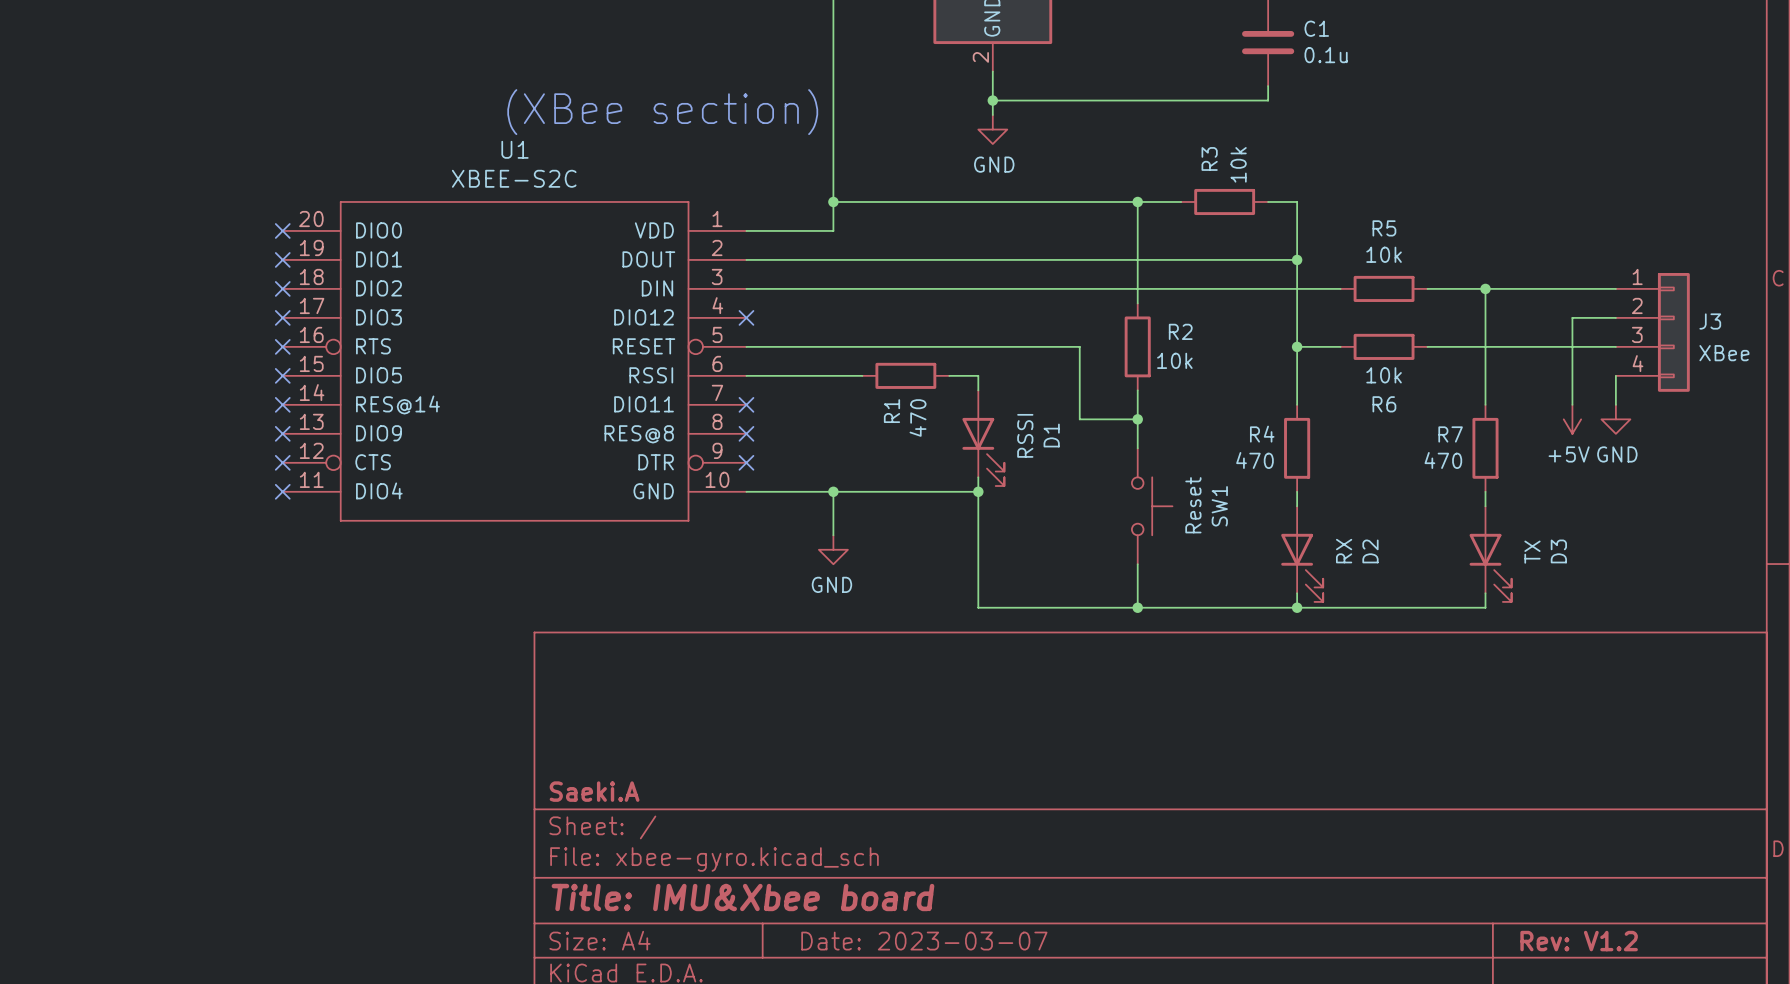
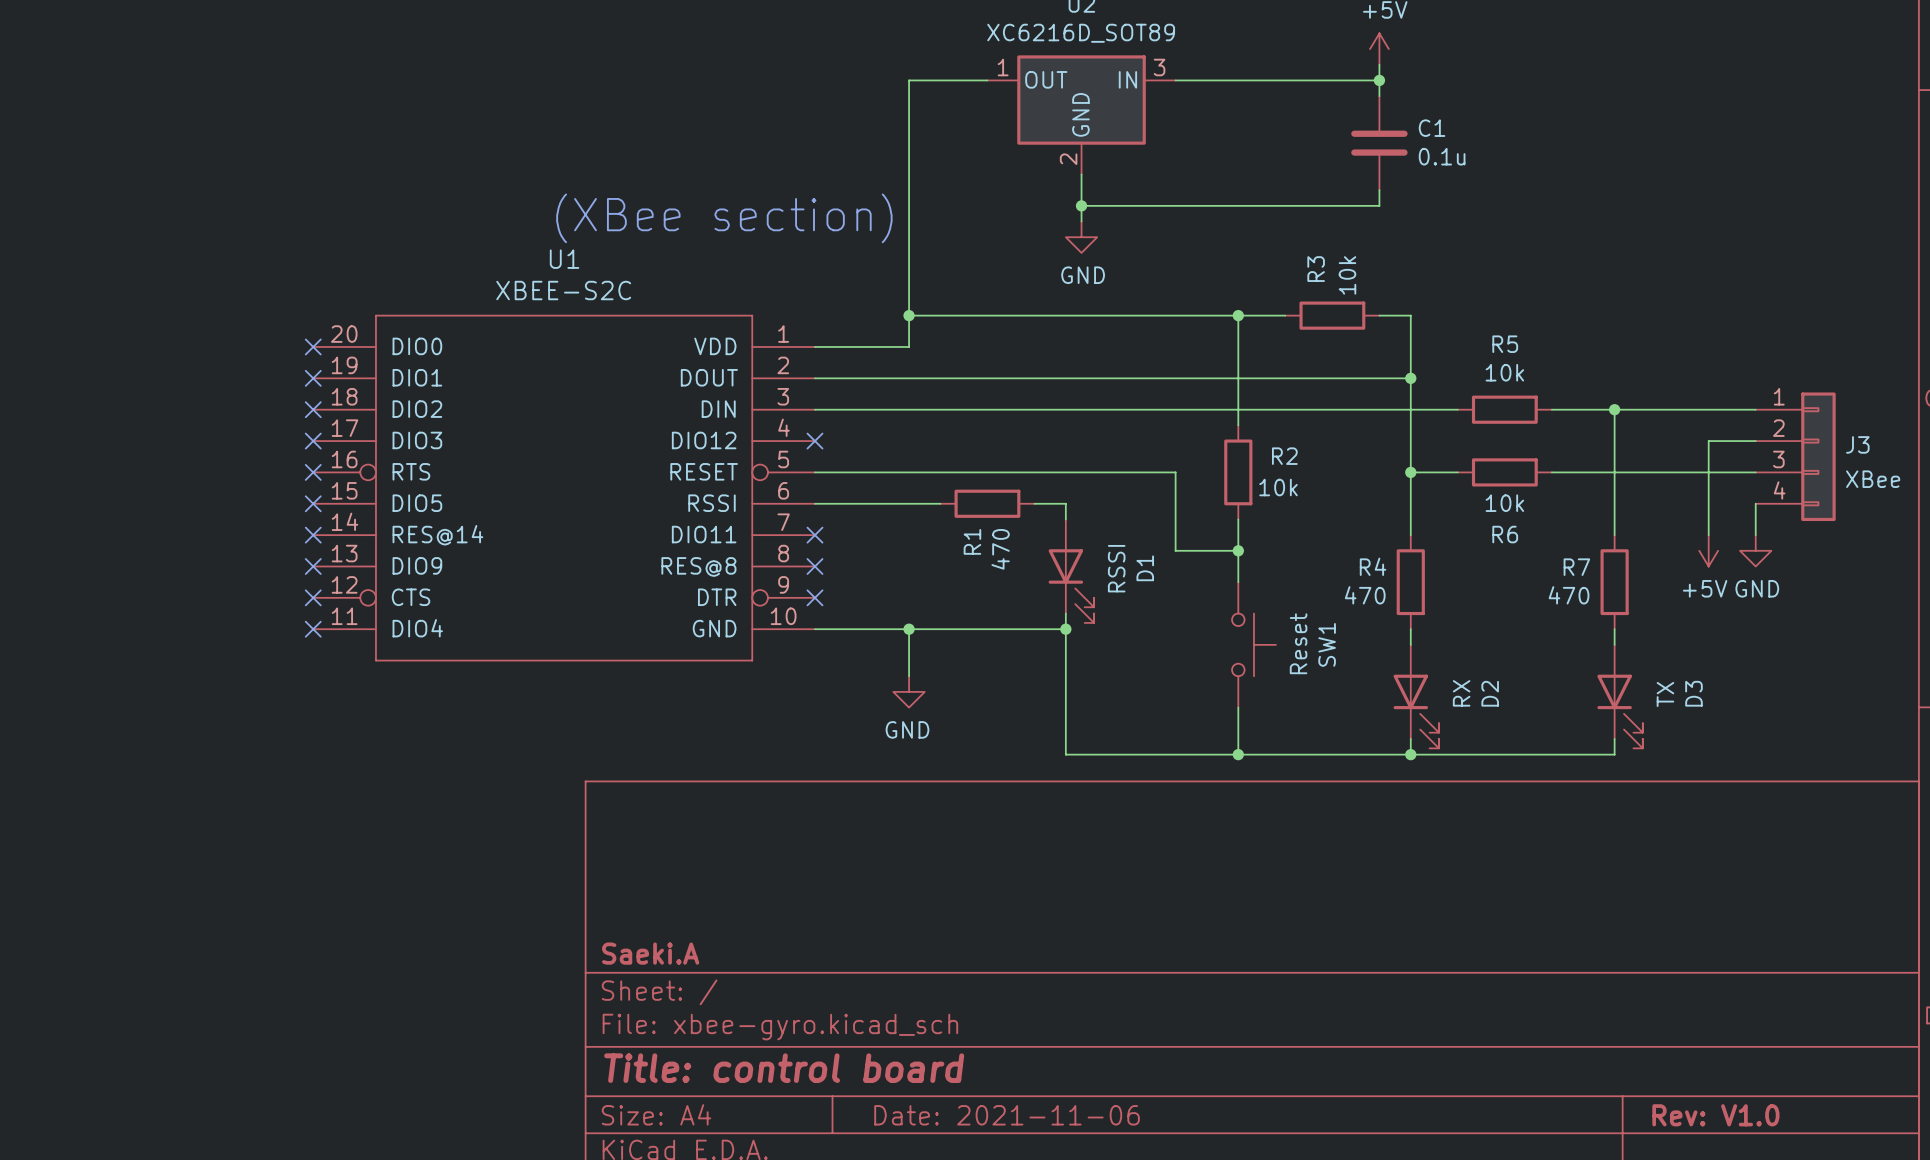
title block: Title: IMU&Xbee board (742, 897) -> Title: control board (784, 1068)
title block: Date: 2023-03-07 (924, 941) -> Date: 2021-11-06 (1007, 1115)
title block: Rev: V1.2 (1579, 941) -> Rev: V1.0 (1715, 1115)

